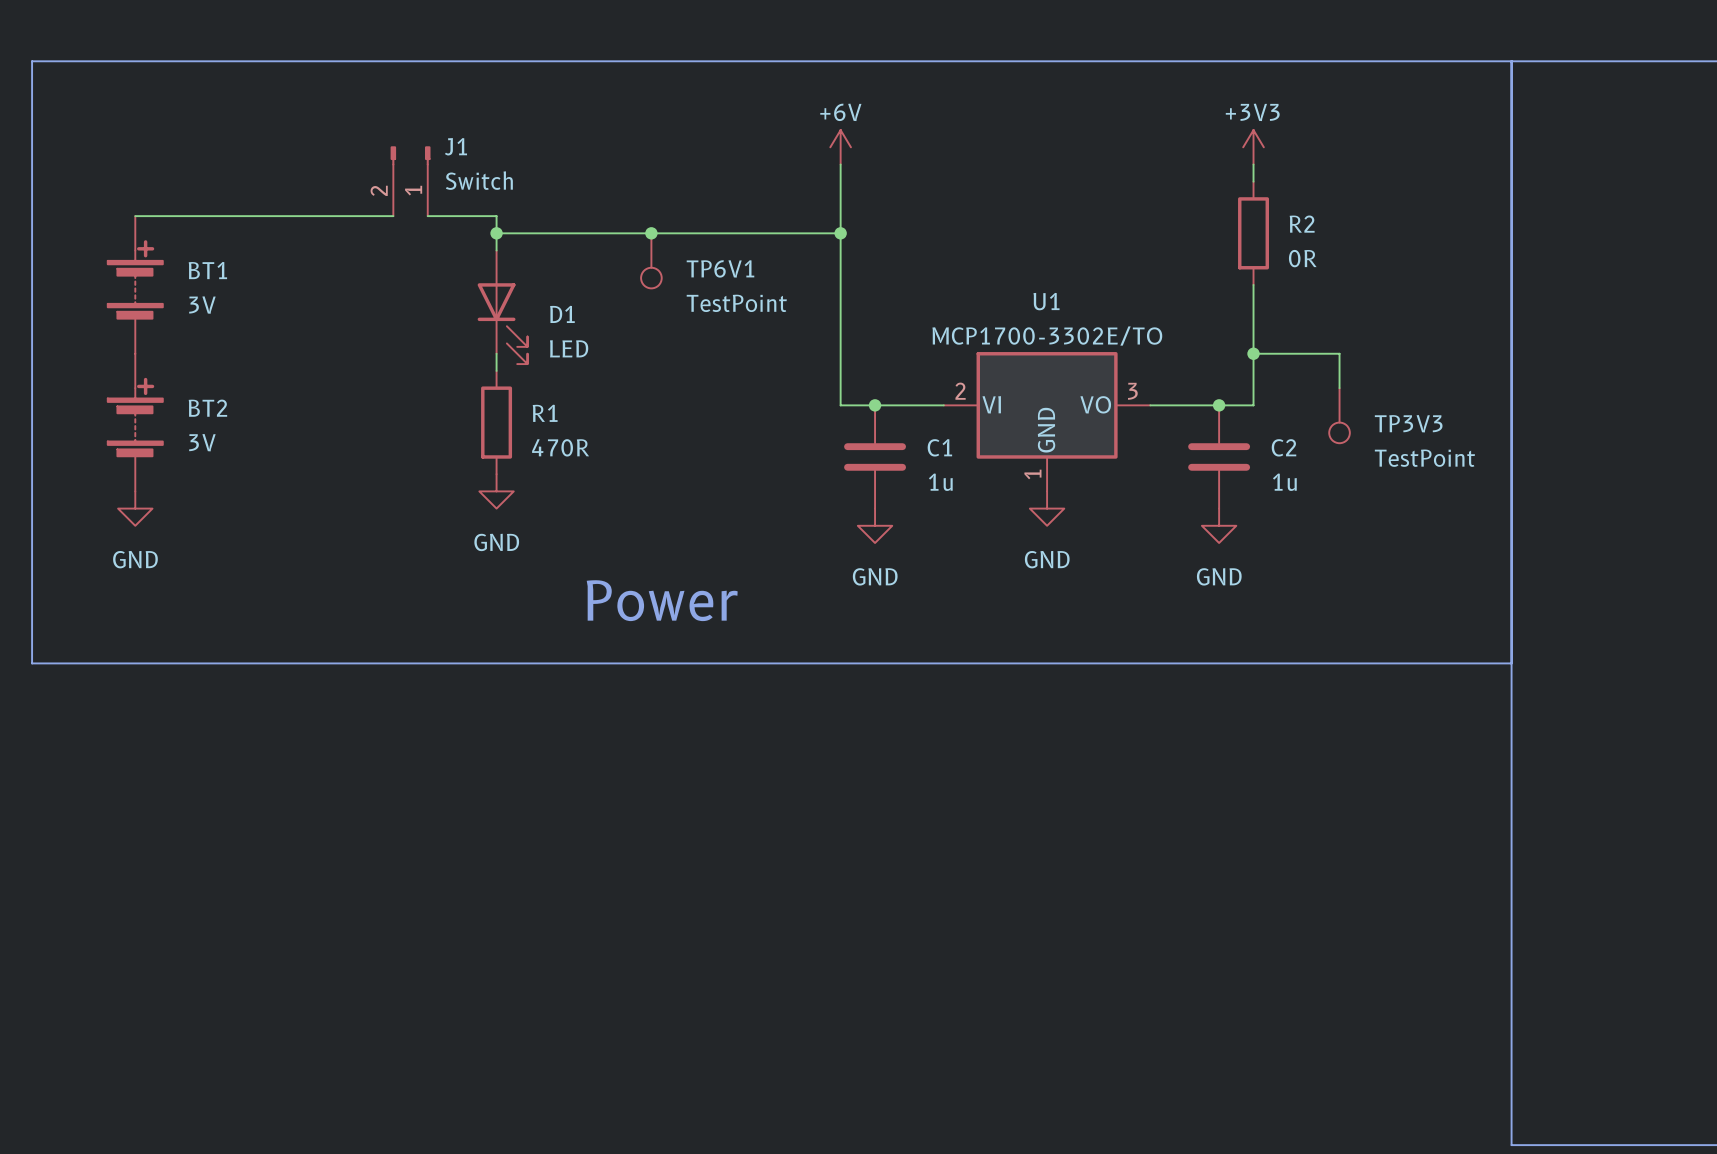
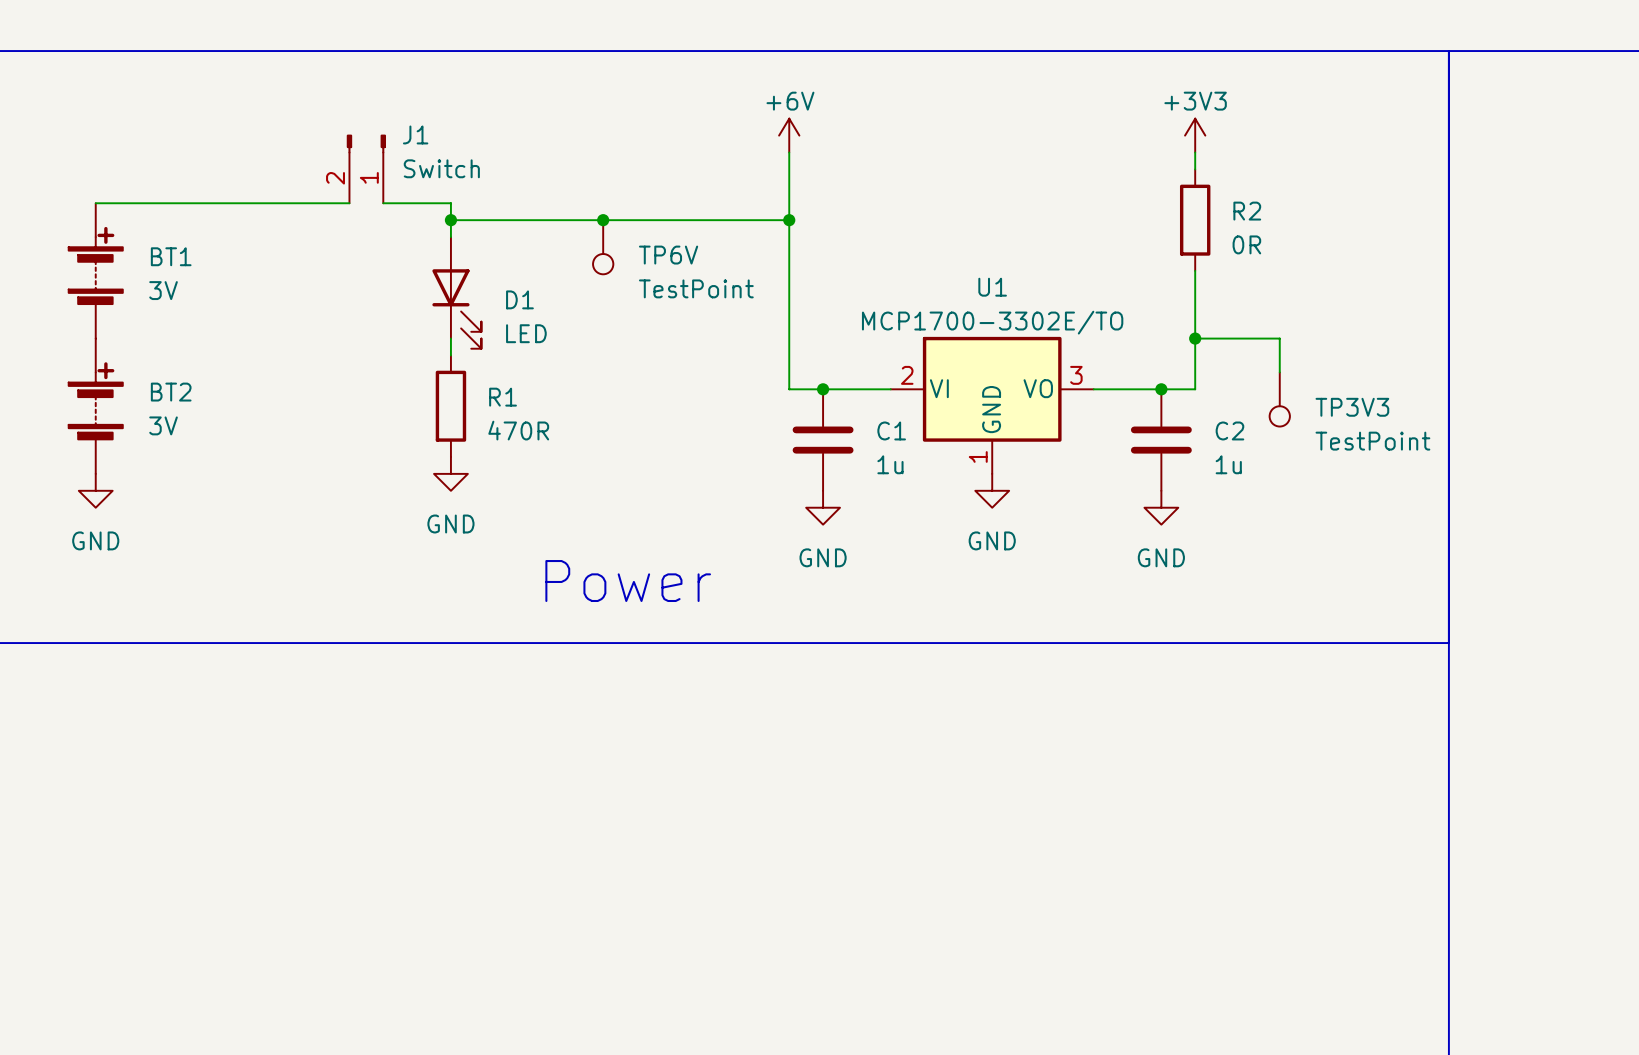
TP6V1 name: TP6V1 (720, 268) -> TP6V (668, 255)

